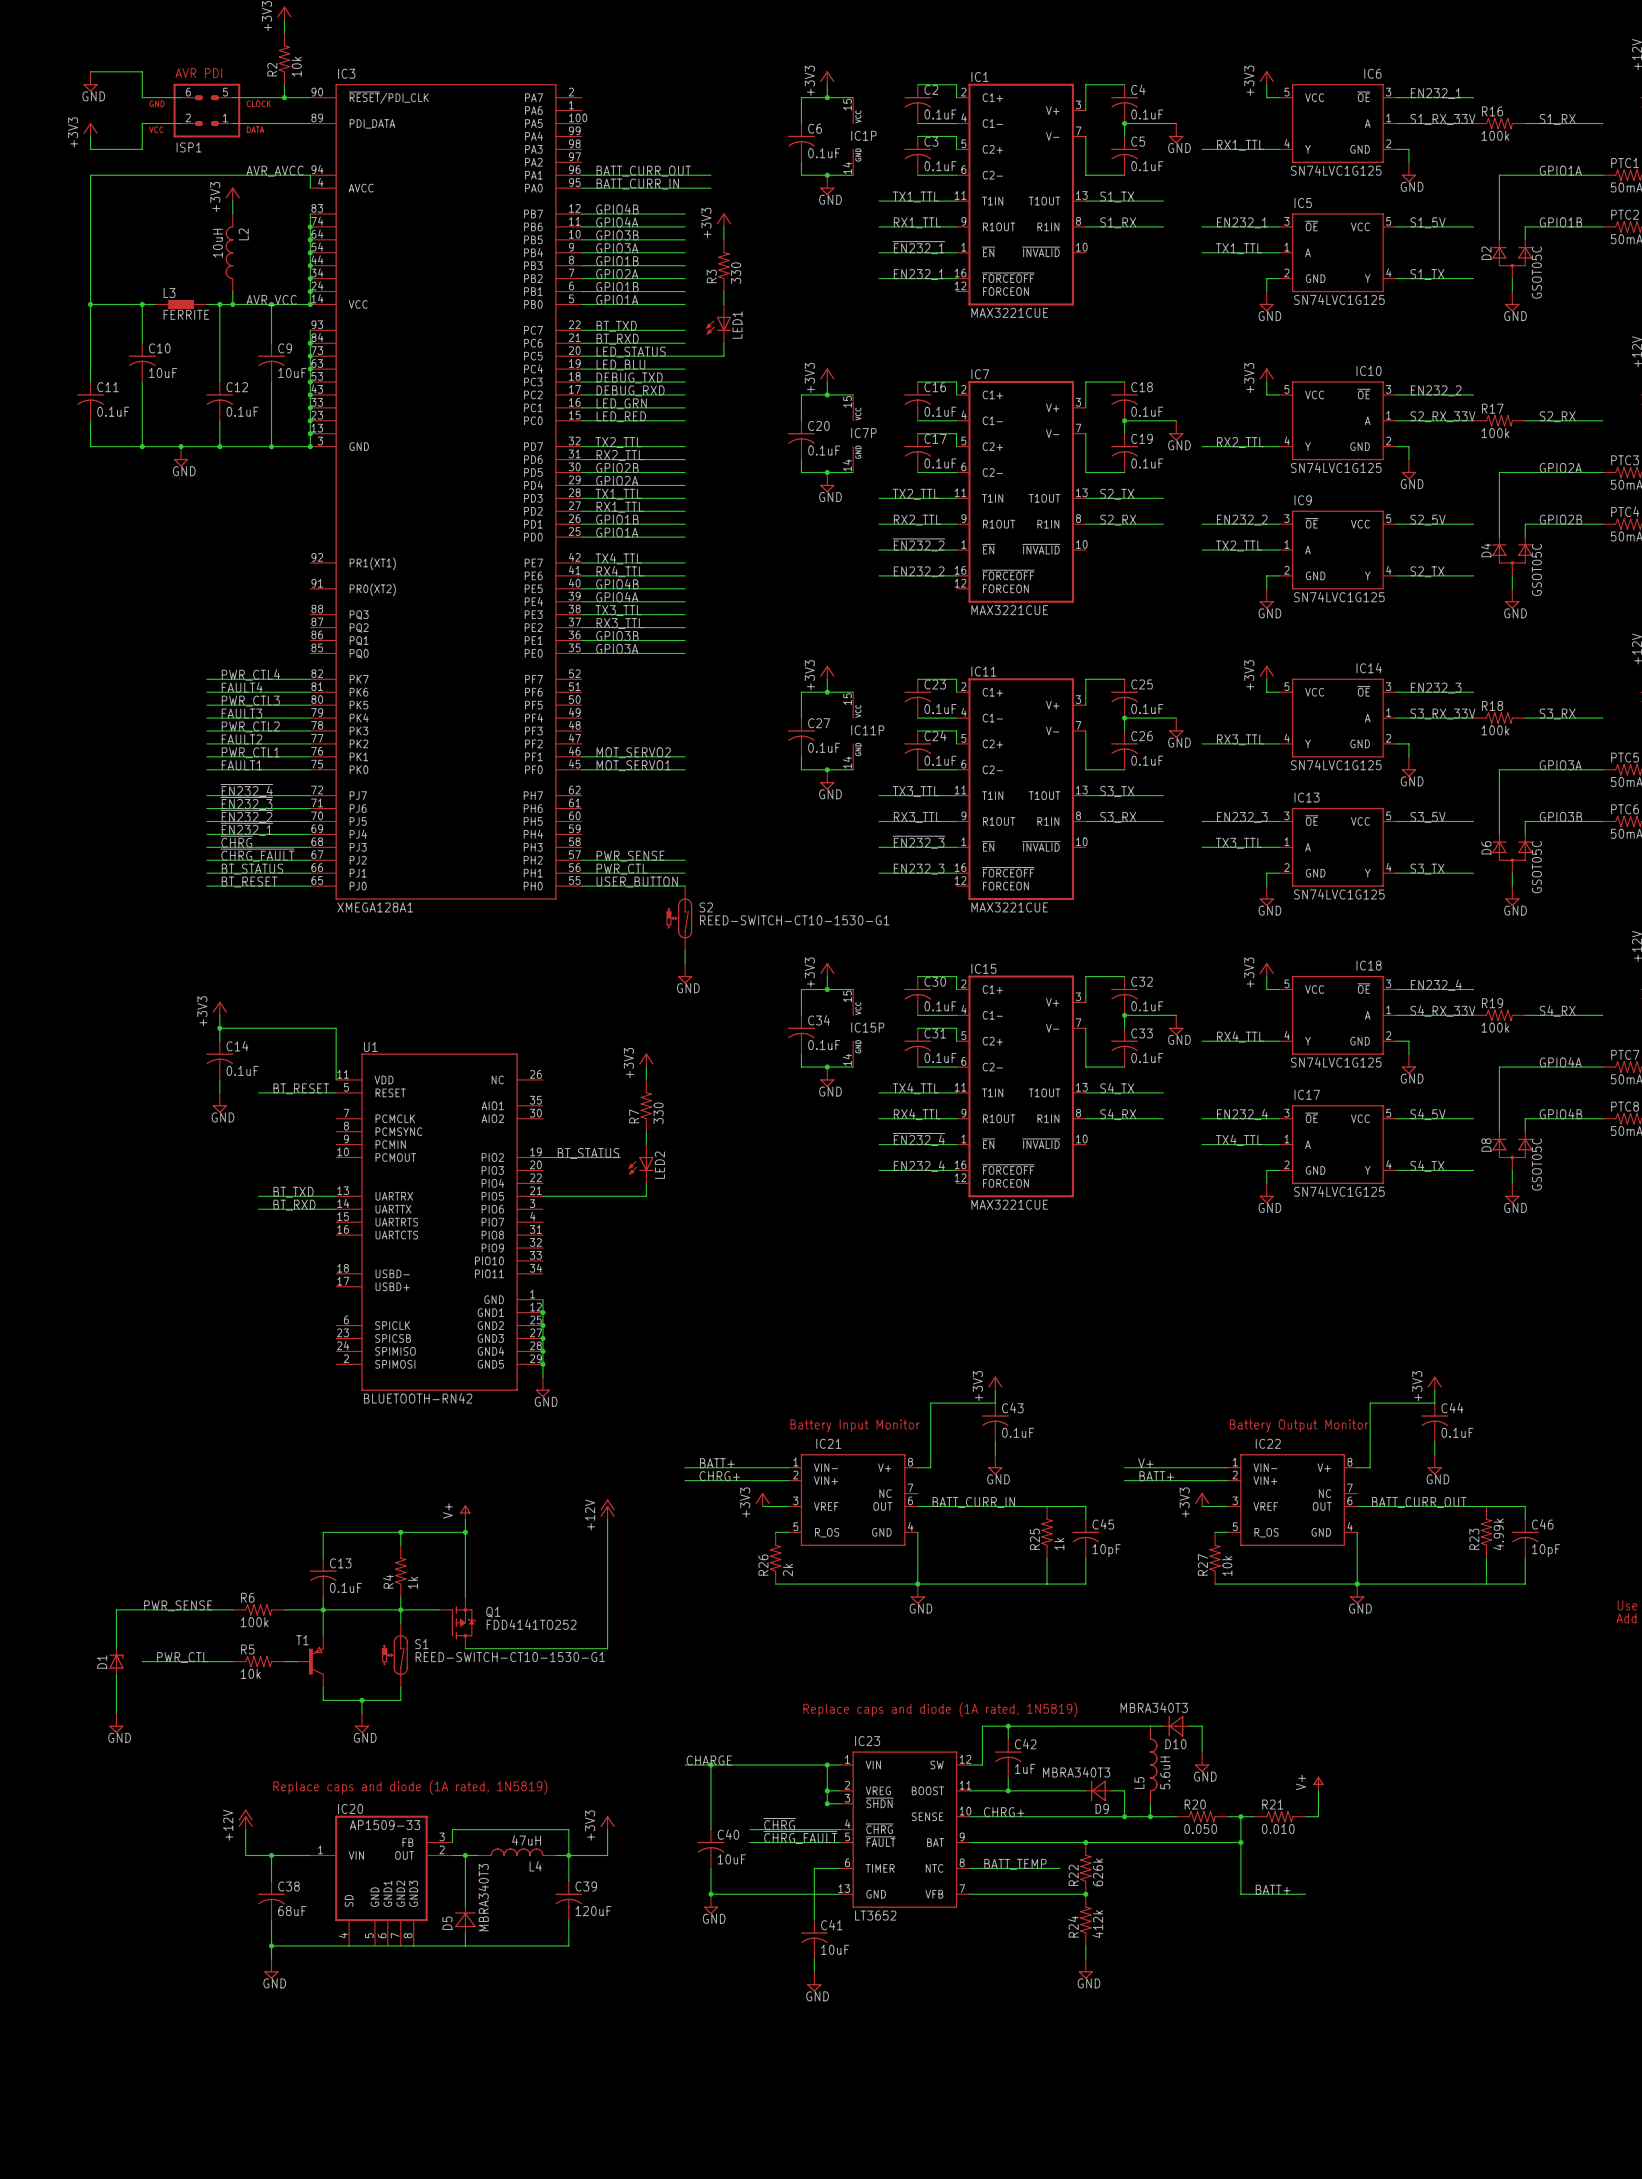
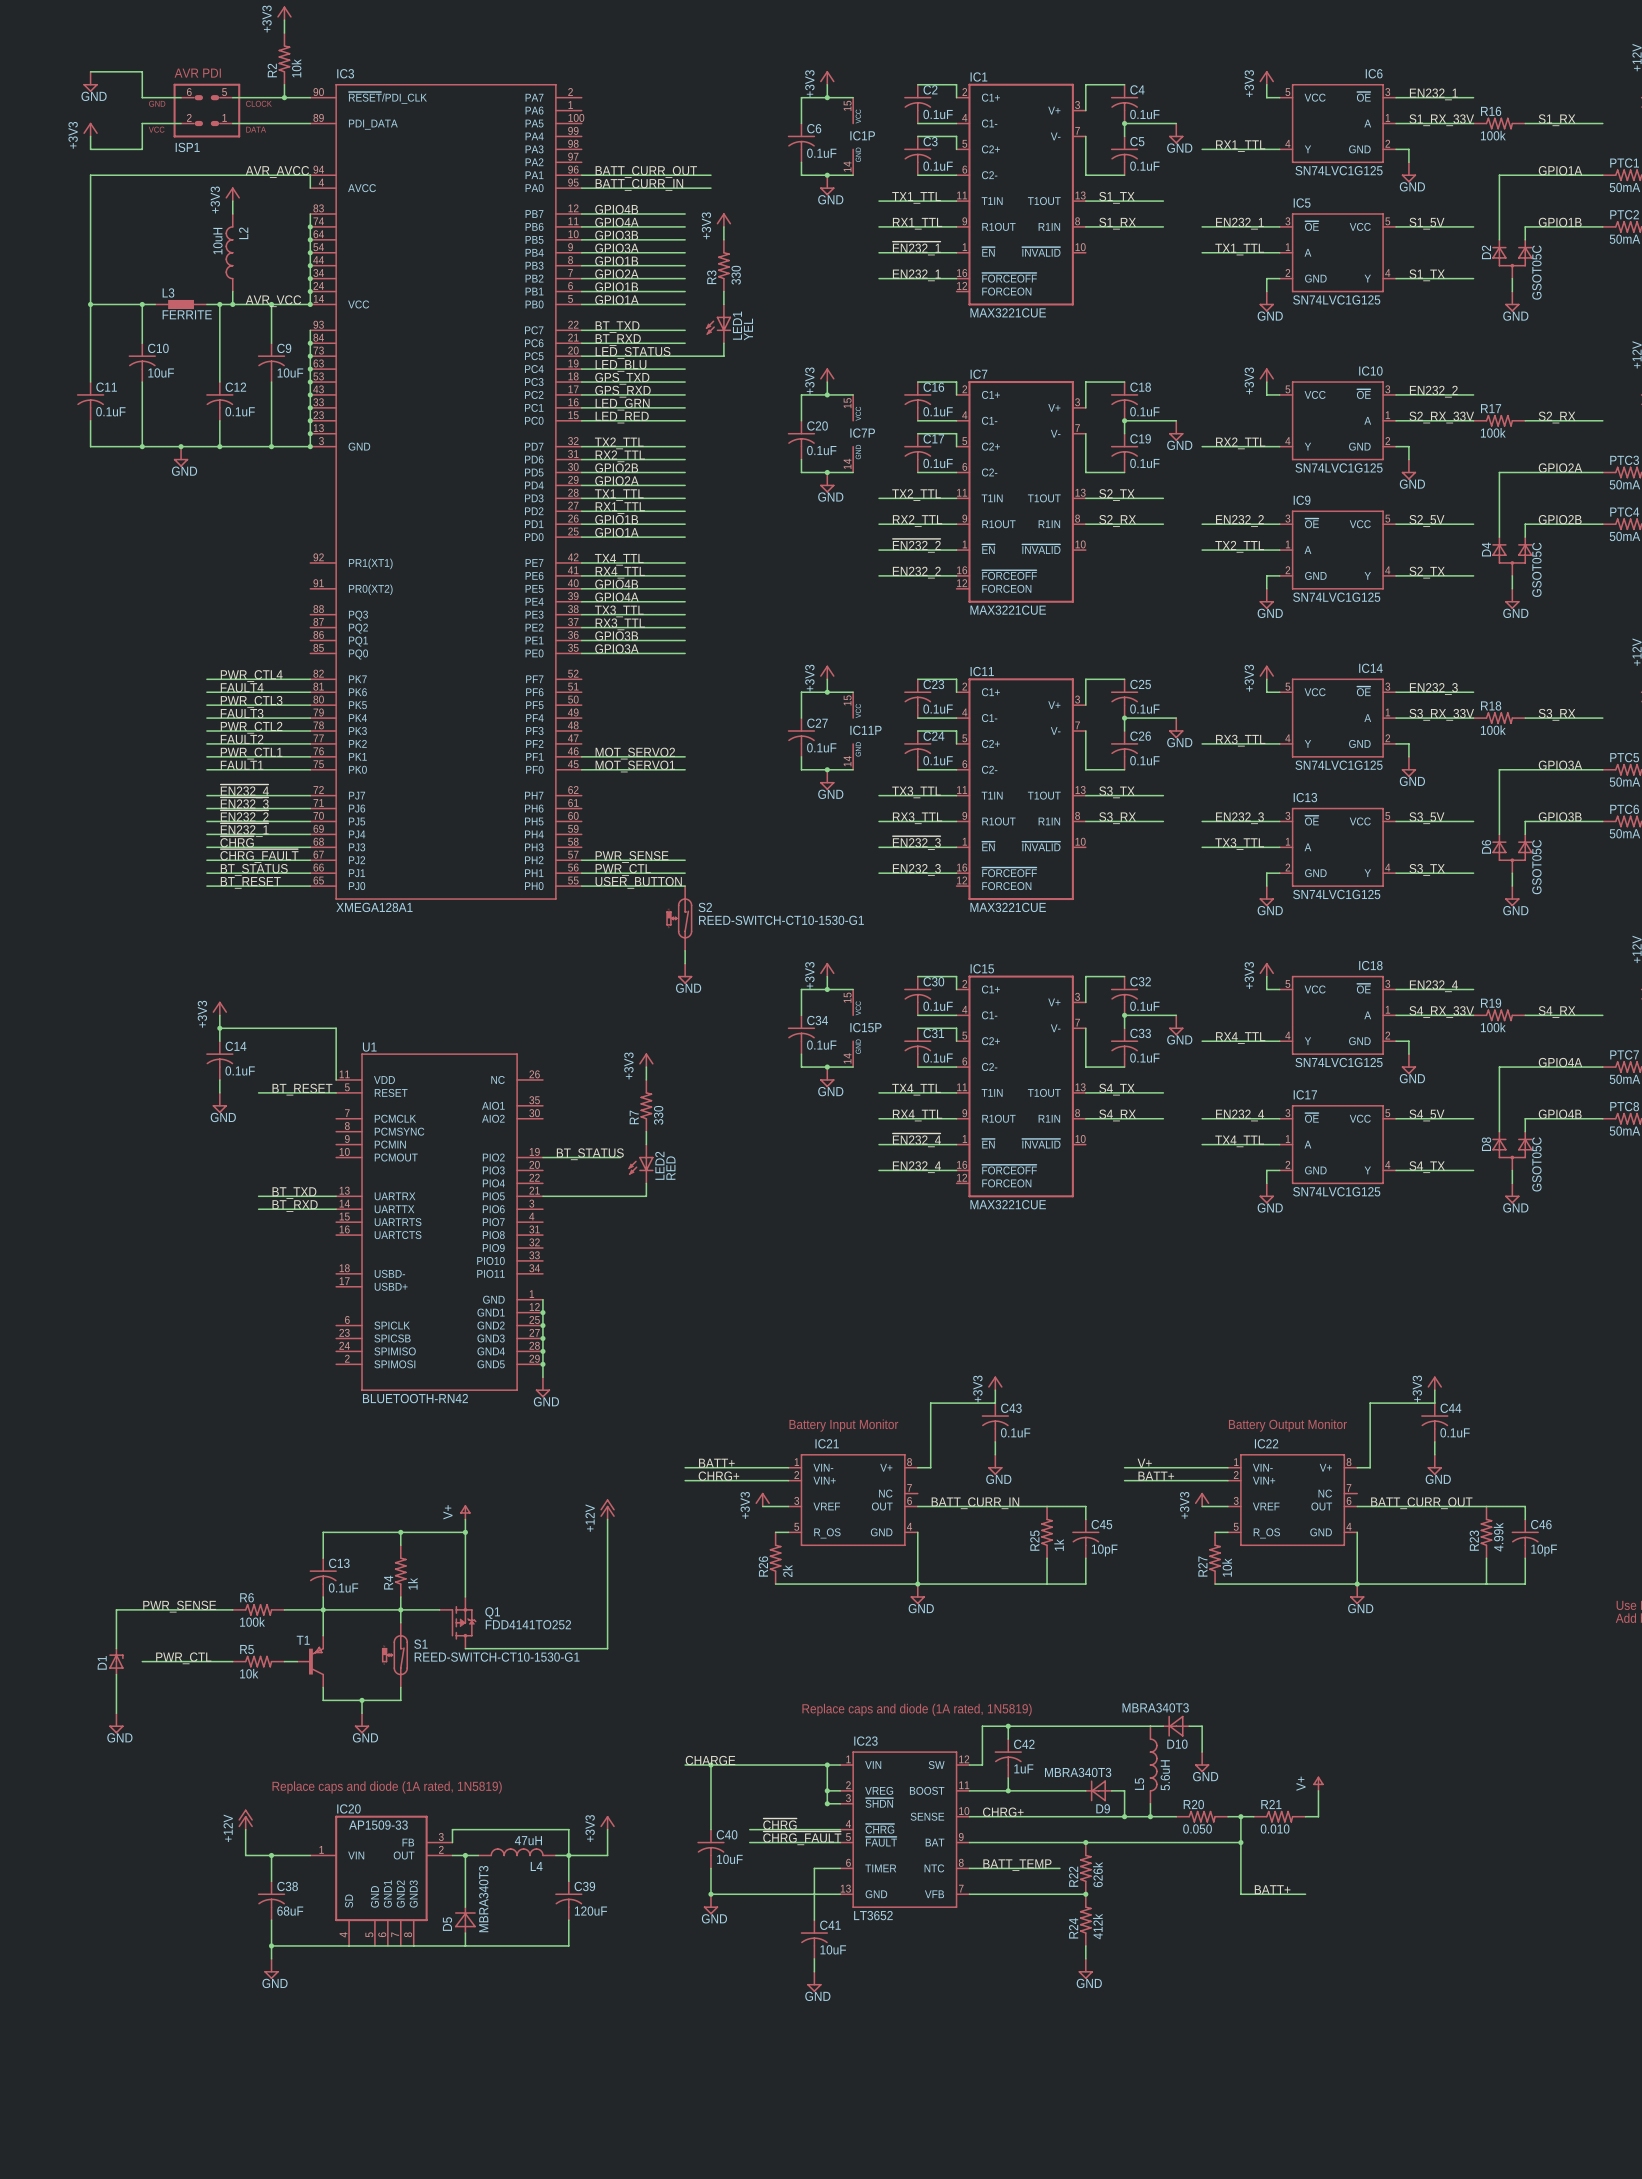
LED1 value: none -> YEL (748, 329)
label: DEBUG_TXD (629, 377) -> GPS_TXD (622, 378)
label: DEBUG_RXD (630, 390) -> GPS_RXD (622, 391)
LED2 value: none -> RED (670, 1168)

